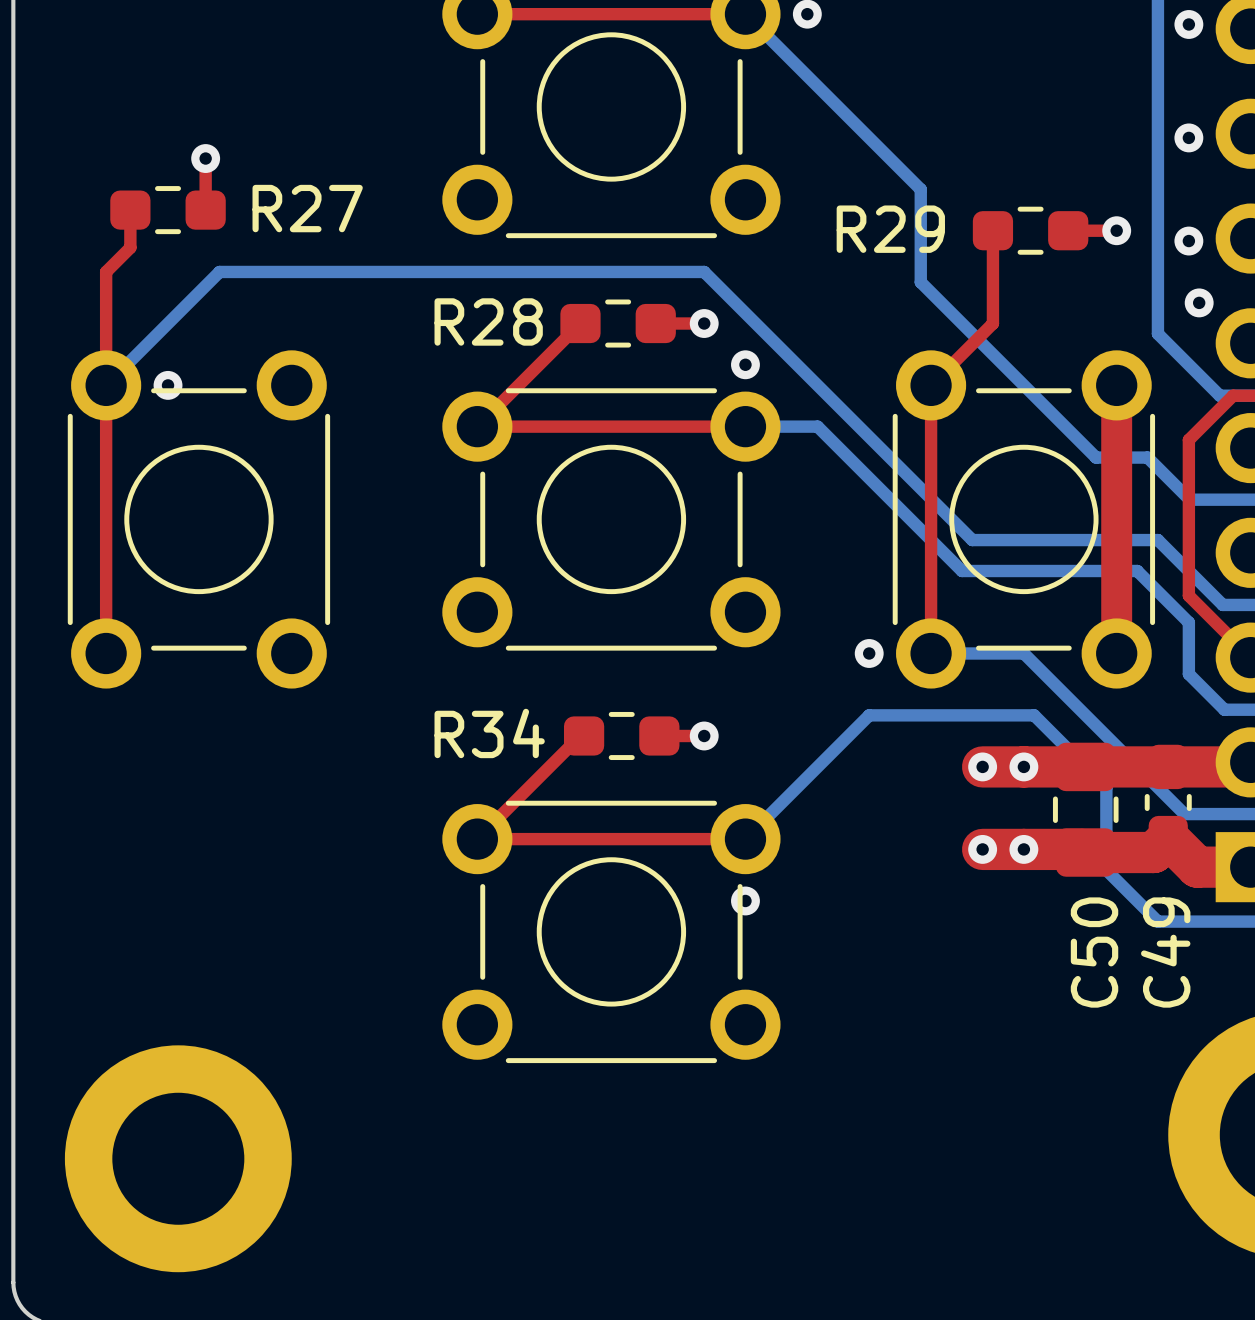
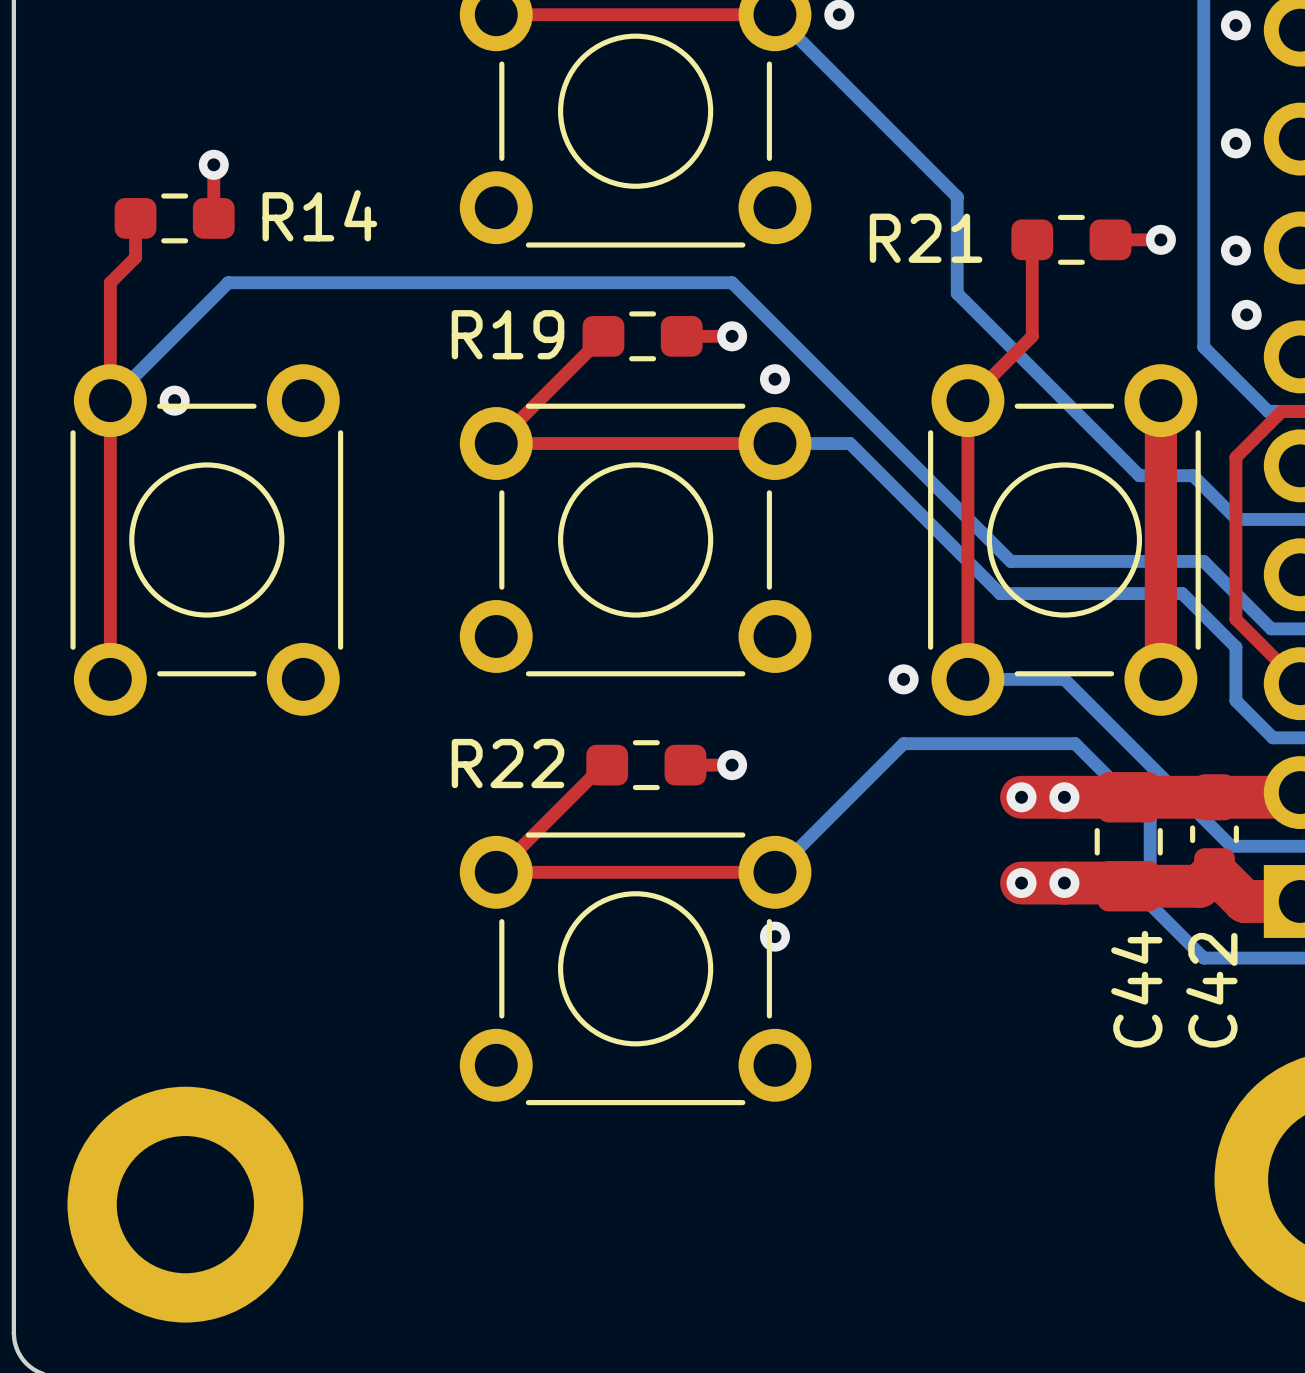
R27 name: R27 (307, 208) -> R14 (319, 215)
R29 name: R29 (890, 229) -> R21 (926, 238)
R28 name: R28 (488, 321) -> R19 (508, 334)
R34 name: R34 (489, 733) -> R22 (508, 763)
C50 name: C50 (1094, 952) -> C44 (1136, 989)
C49 name: C49 (1165, 952) -> C42 (1211, 990)

